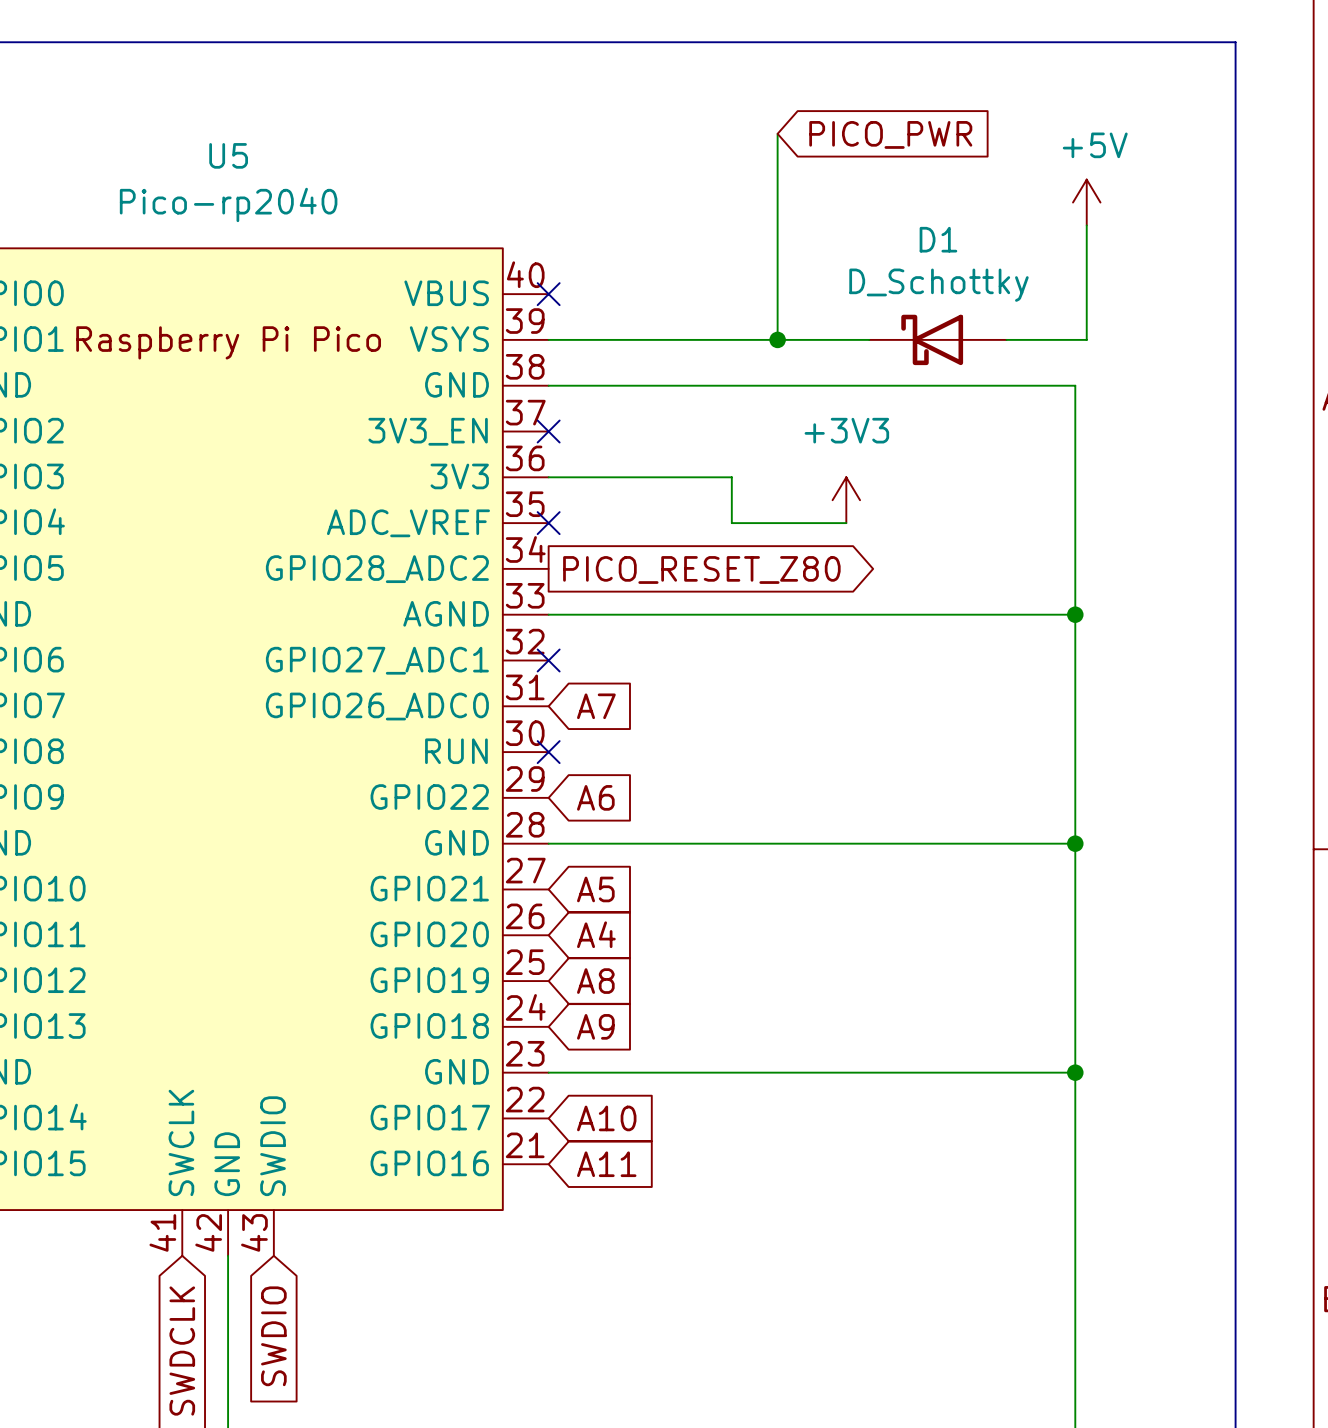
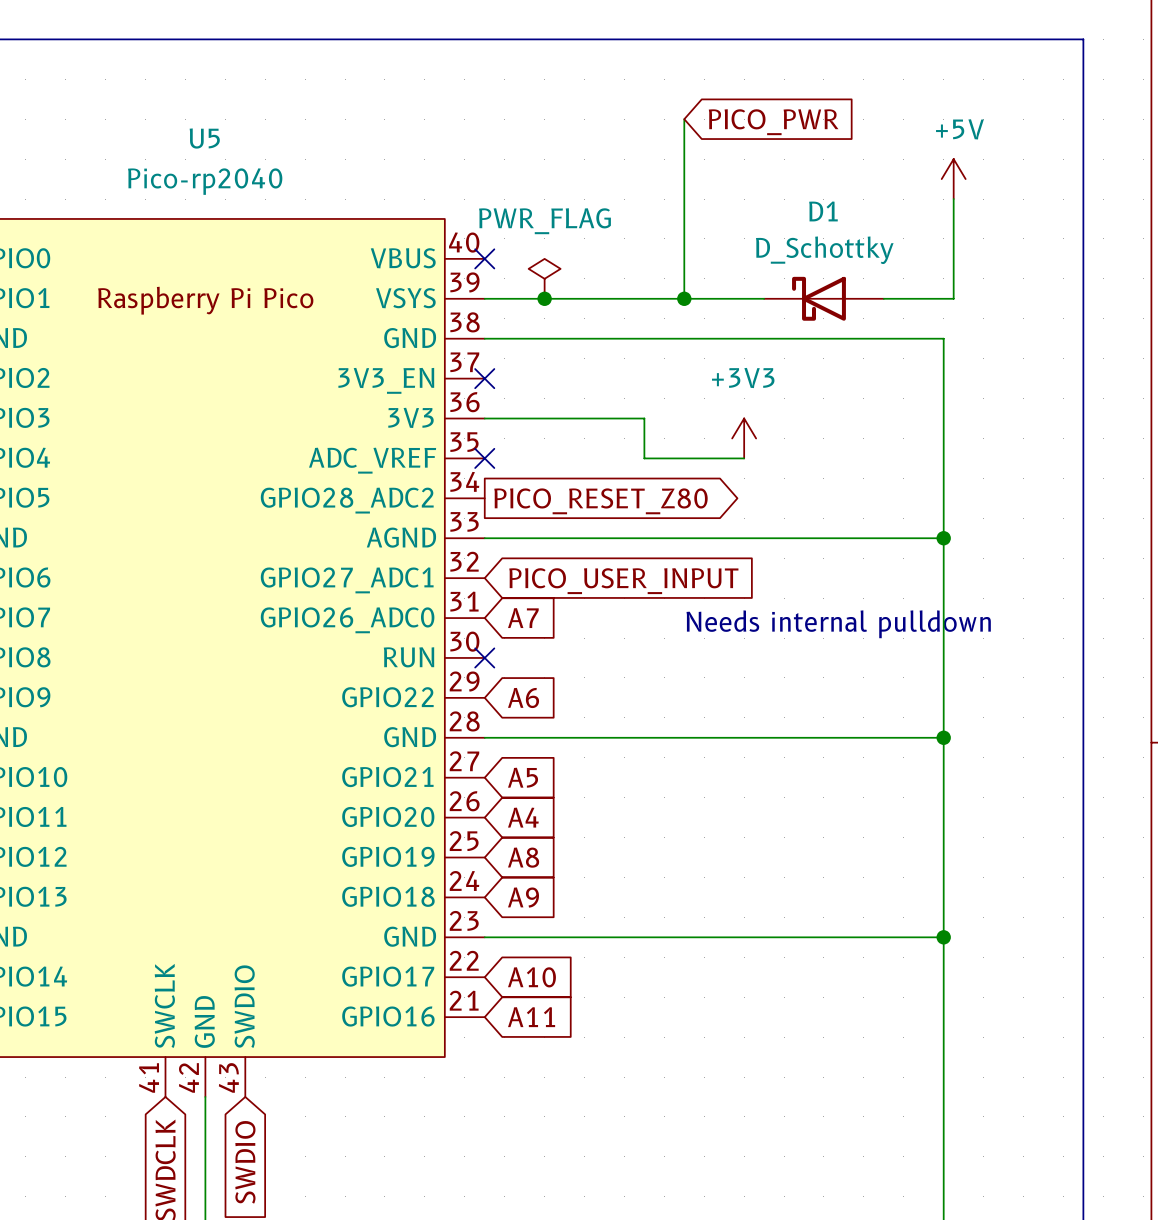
power symbol: none -> PWR_FLAG (544, 278)
junction: none -> (544, 298)
no-connect mark: (548, 660) -> none
global label: none -> PICO_USER_INPUT (623, 581)
text: none -> Needs internal pulldown (838, 624)

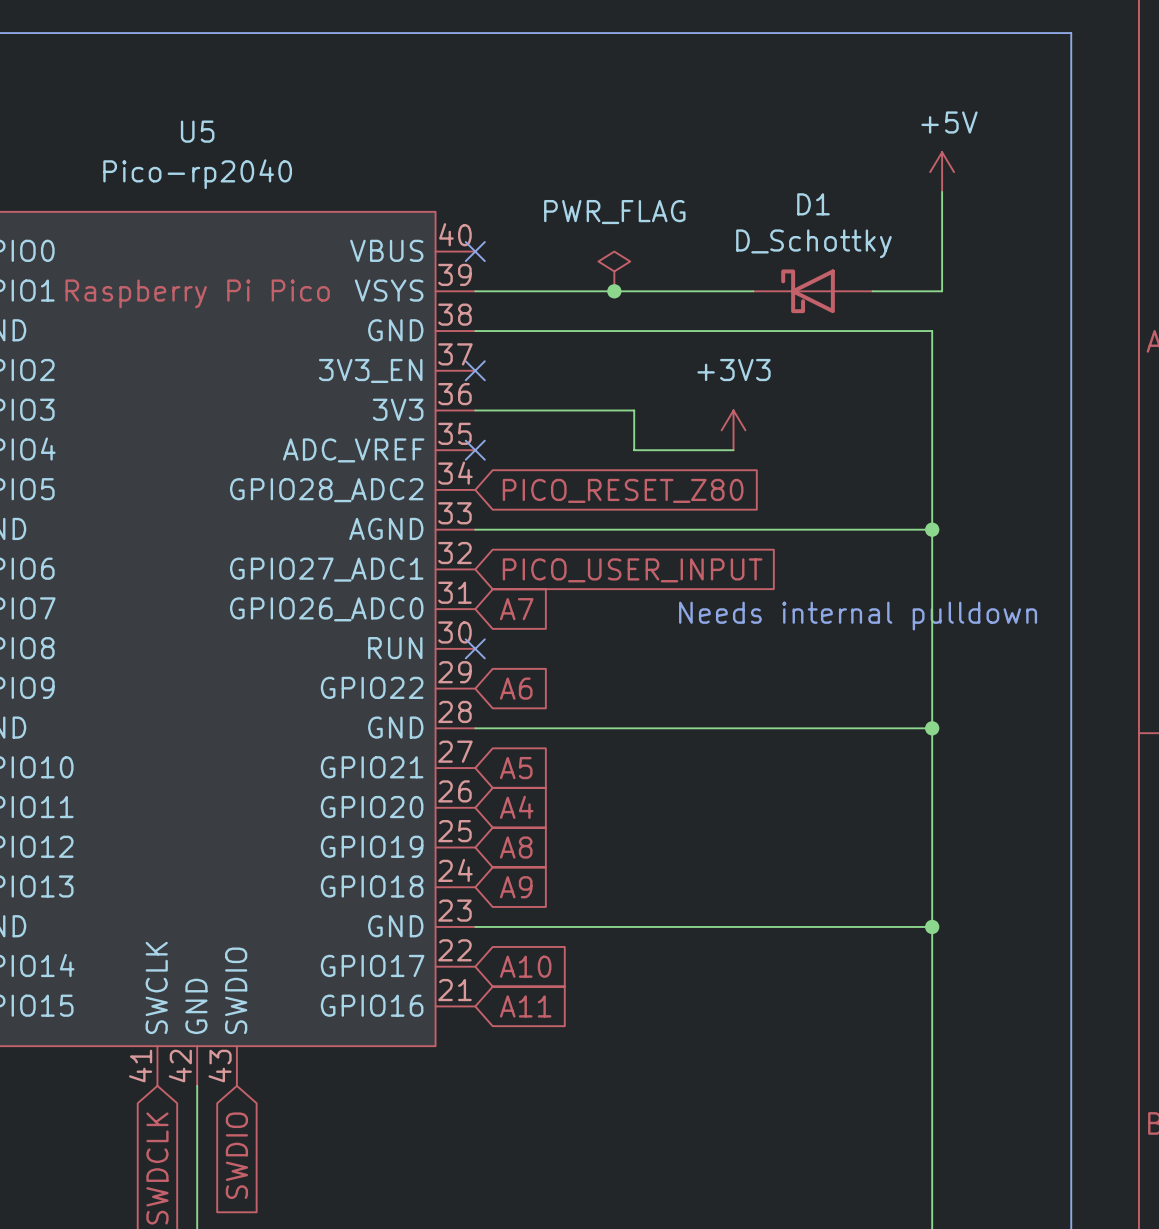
wire: (684, 119) (684, 298) -> none
global label: PICO_PWR (773, 122) -> none
power symbol position: PWR_FLAG (544, 278) -> PWR_FLAG (614, 271)
junction: (544, 298) -> none
junction: none -> (614, 291)
junction: (684, 298) -> none
global label shape: output (600, 501) -> input (623, 490)

